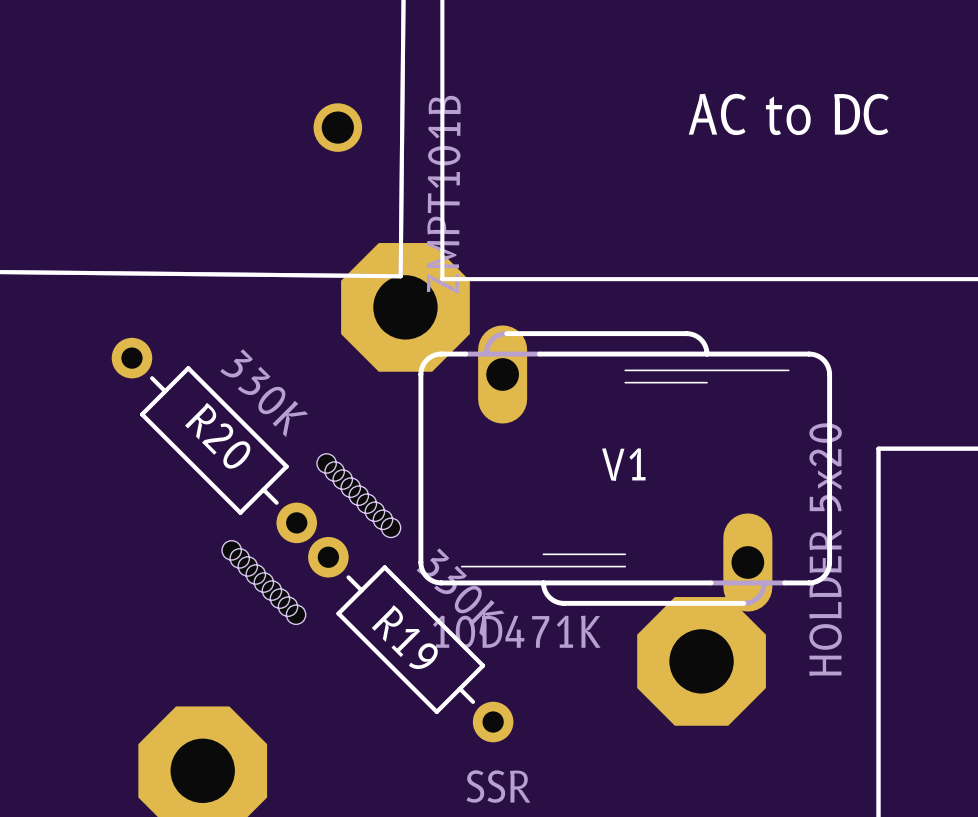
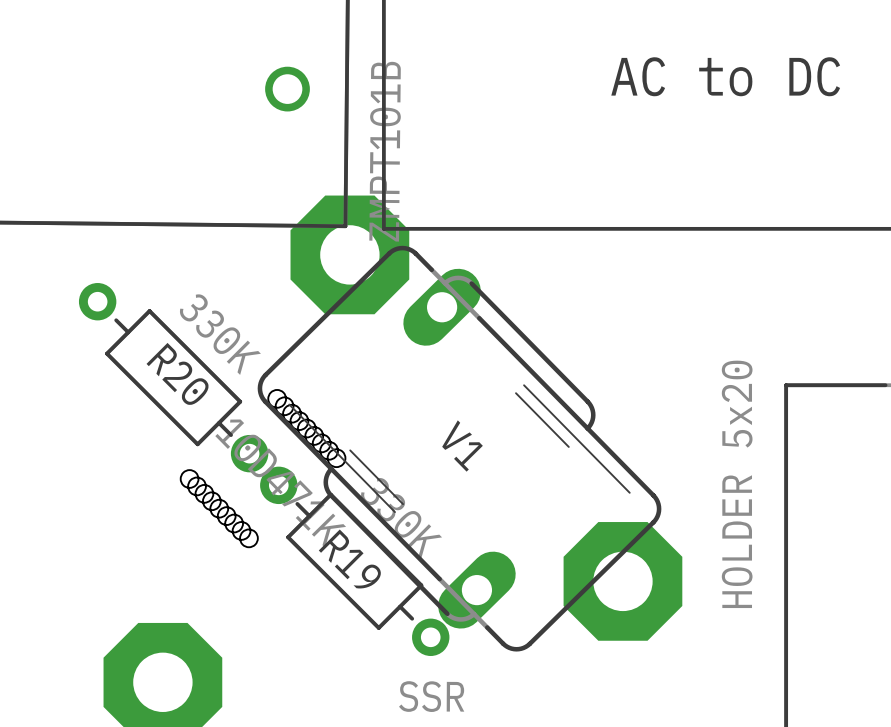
V1 rotation: 0° (625, 468) -> 45.5° clockwise (459, 448)

